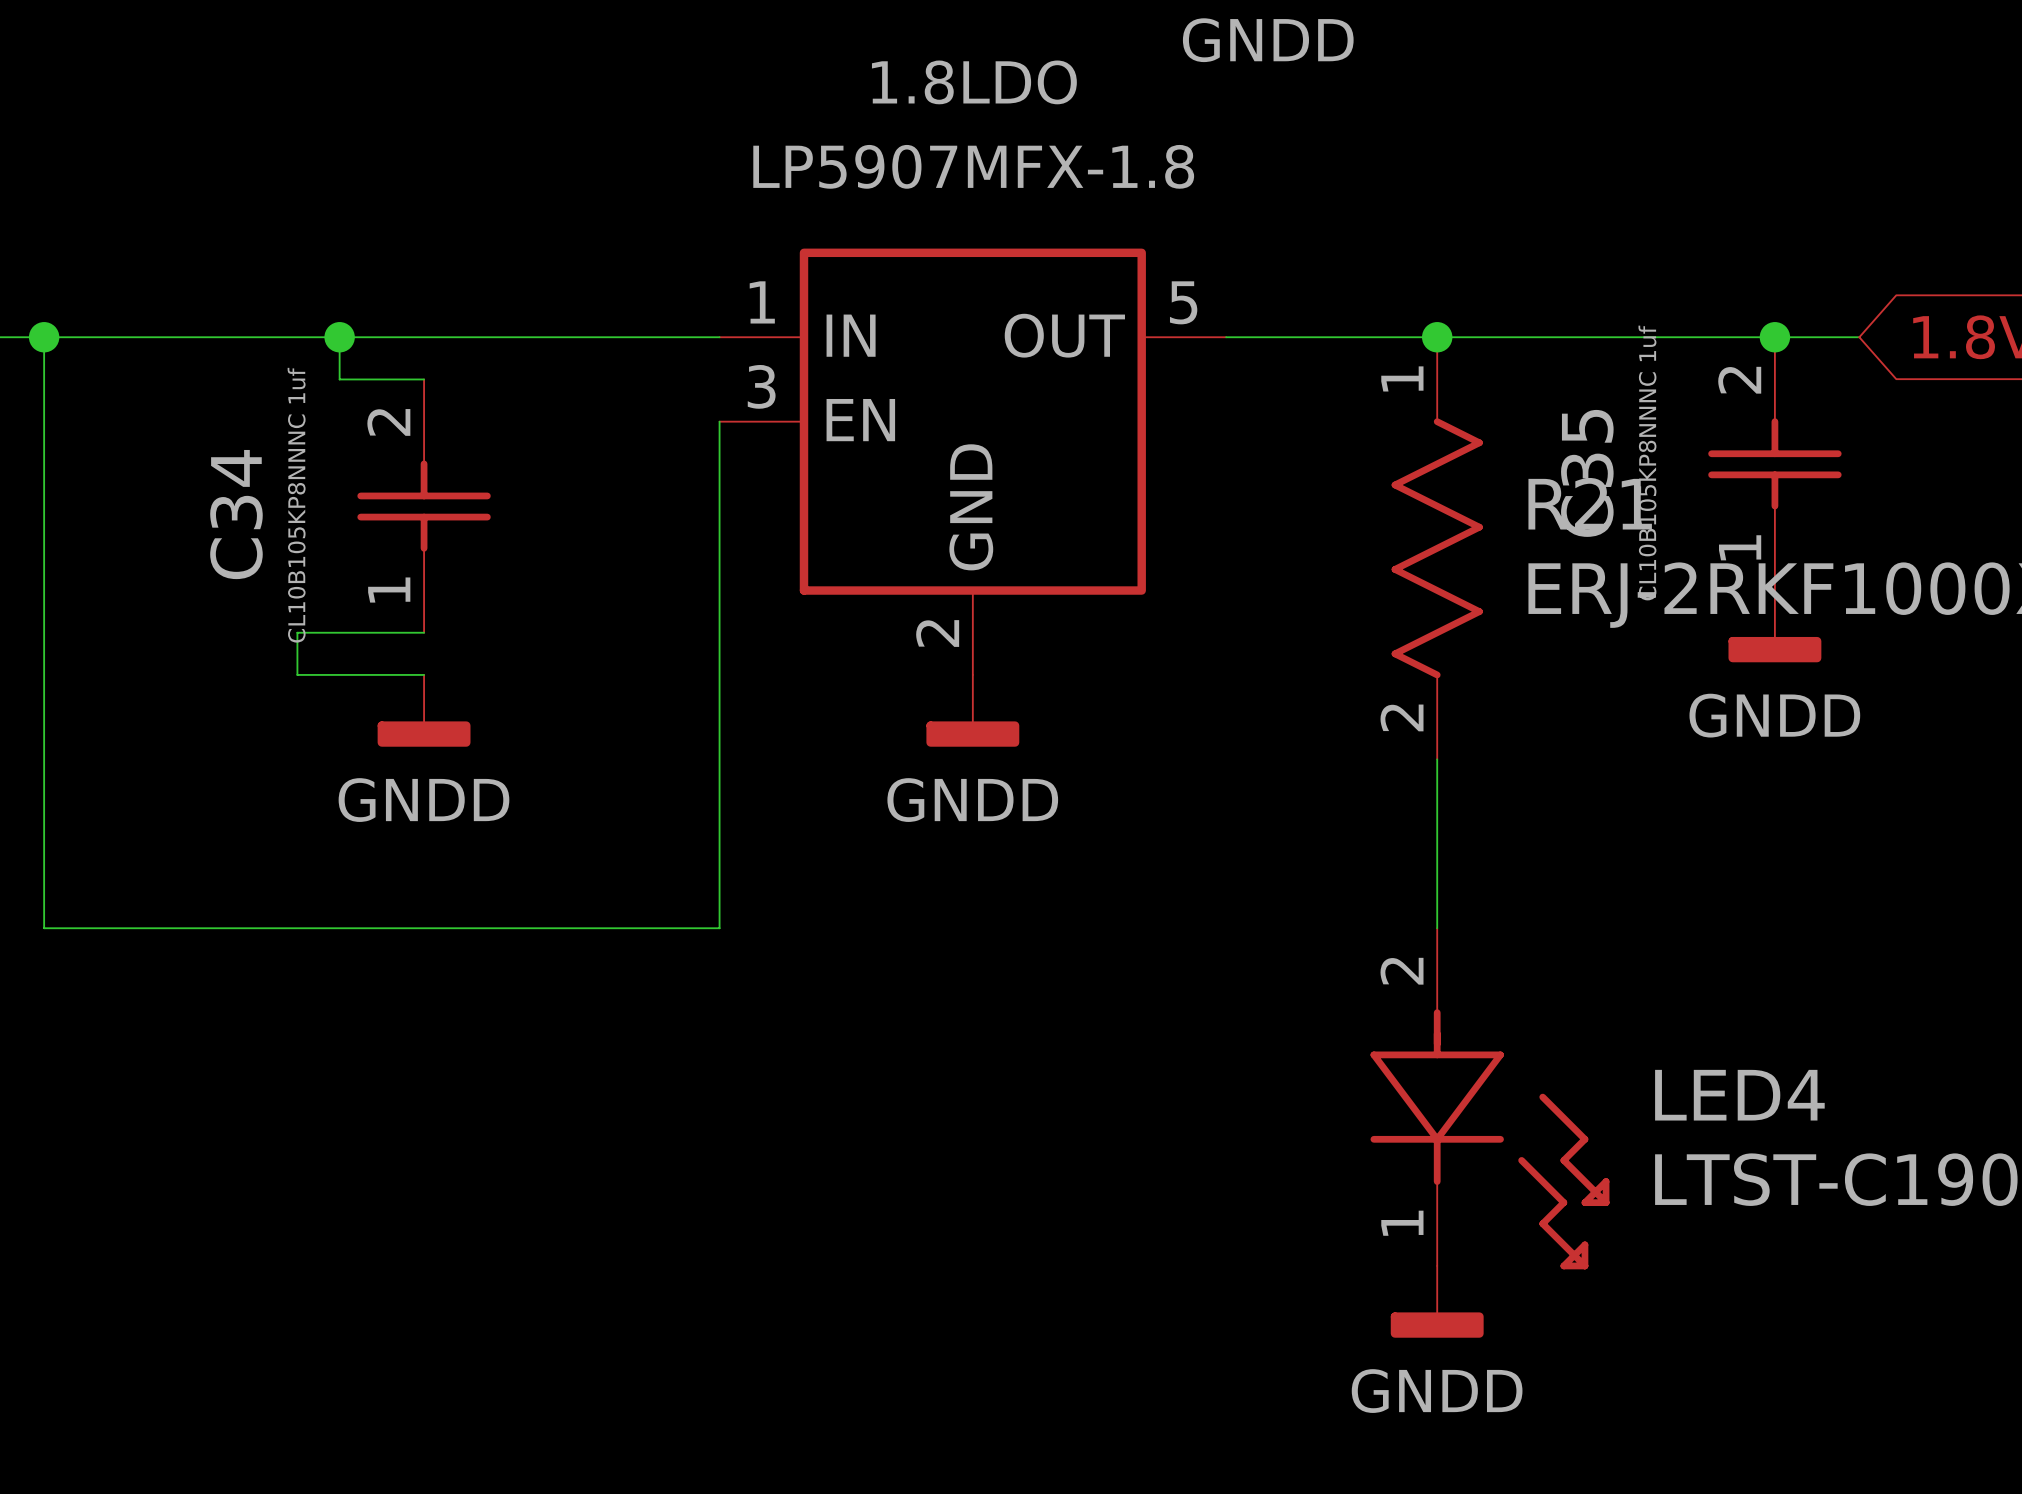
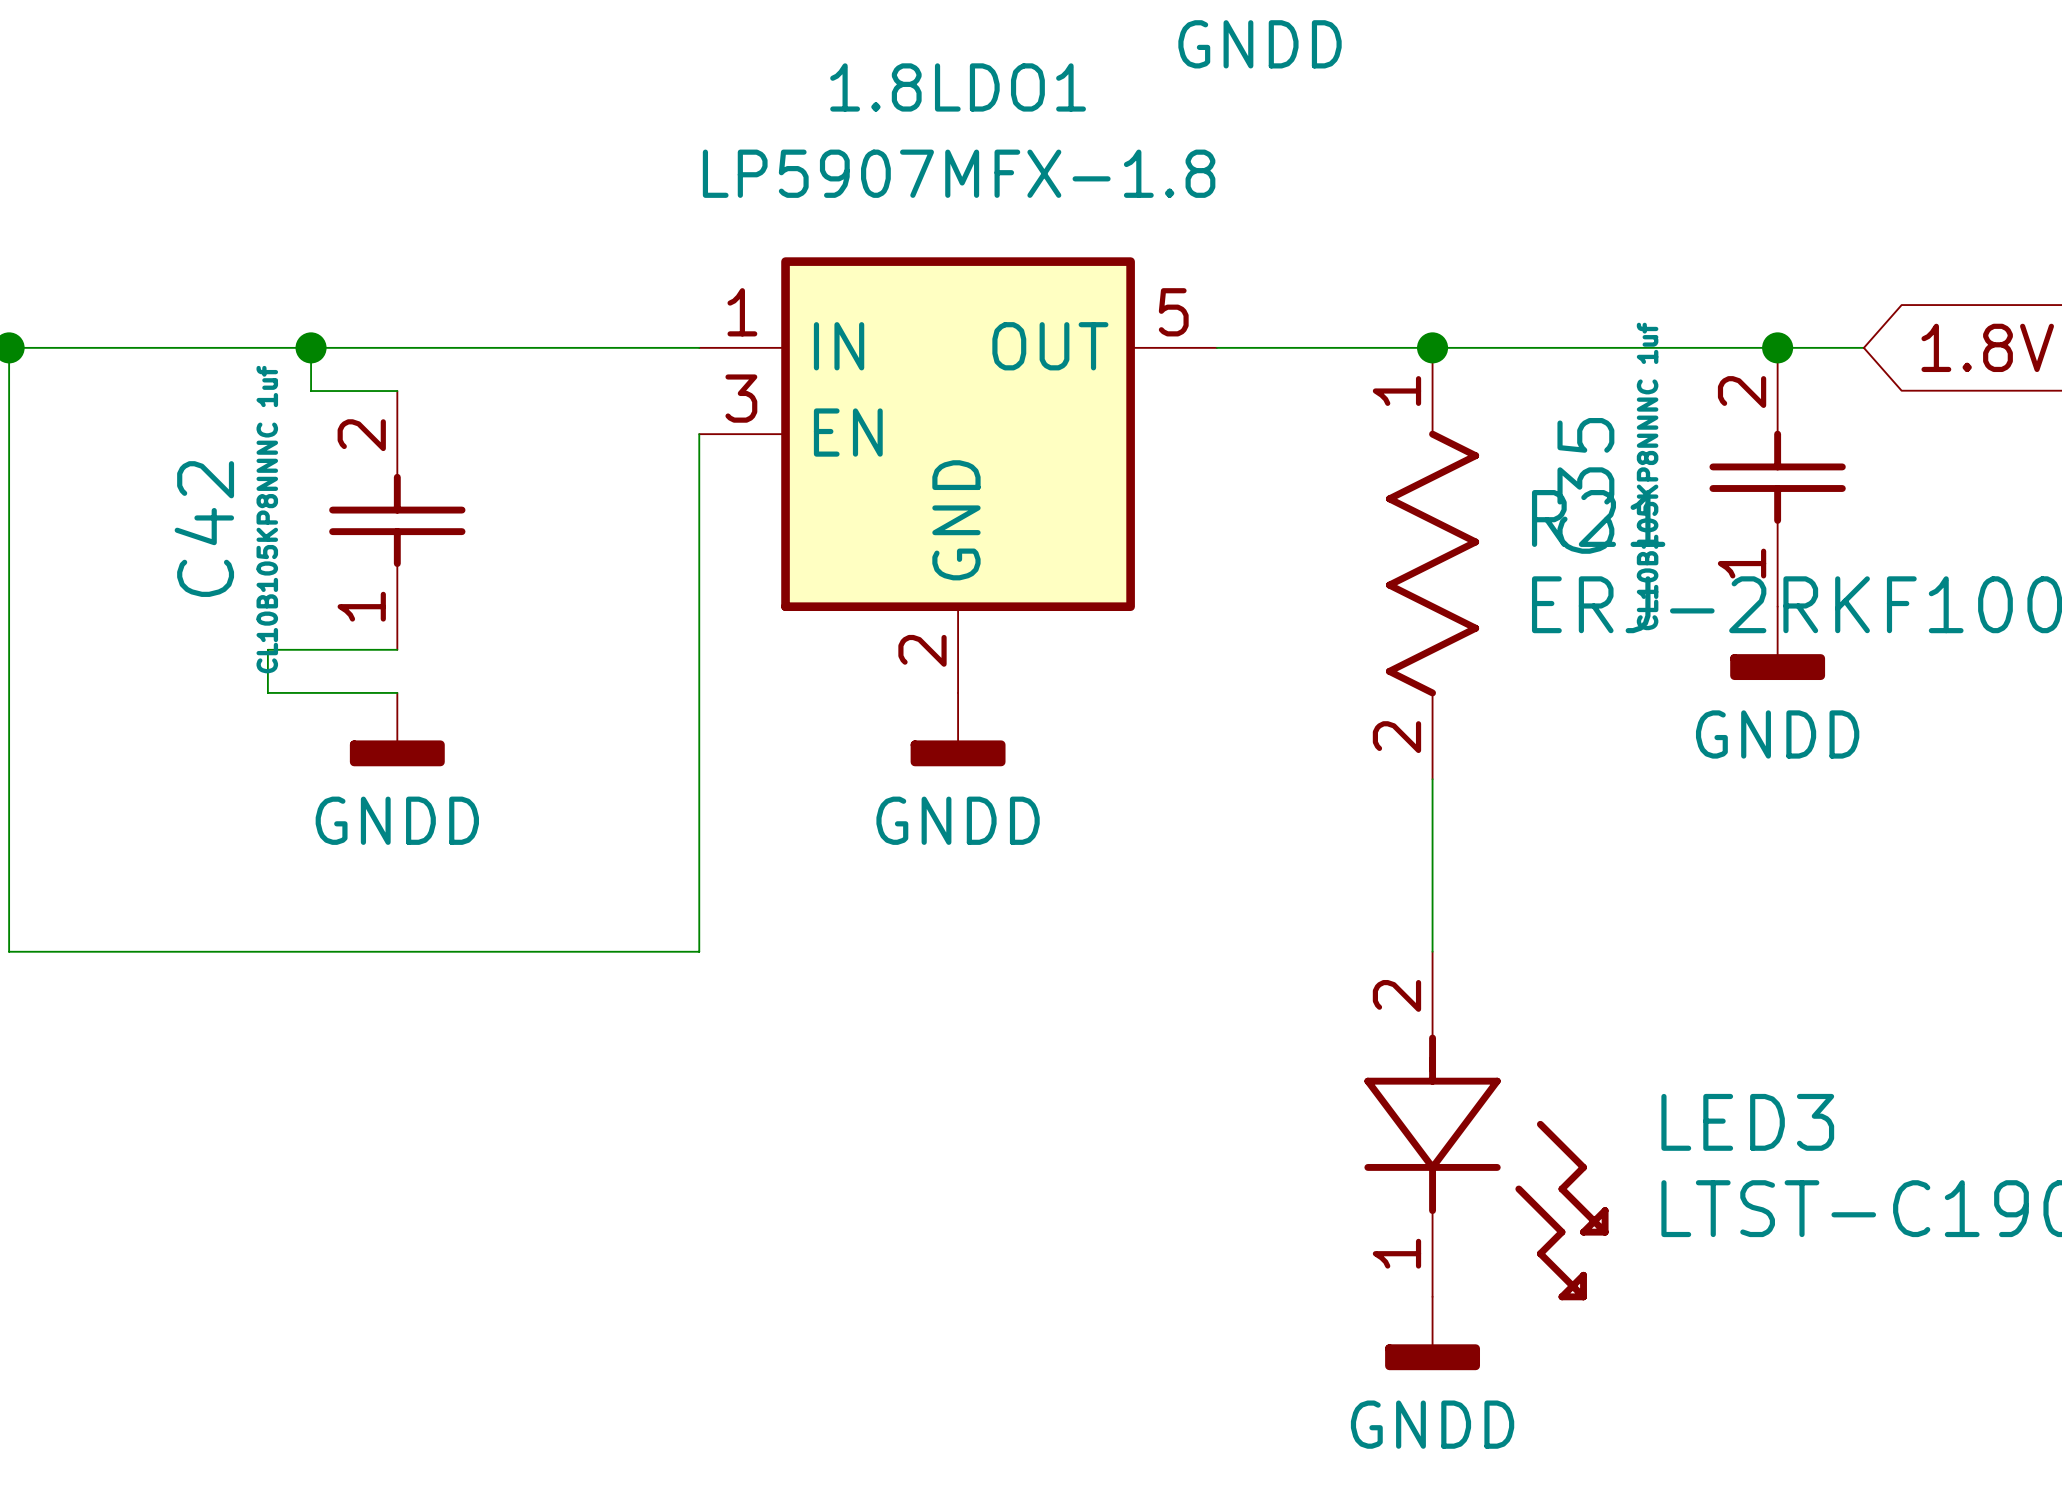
1.8LDO name: 1.8LDO (974, 82) -> 1.8LDO1 (958, 87)
C34 name: C34 (236, 514) -> C42 (204, 529)
LED4 name: LED4 (1739, 1095) -> LED3 (1747, 1122)

